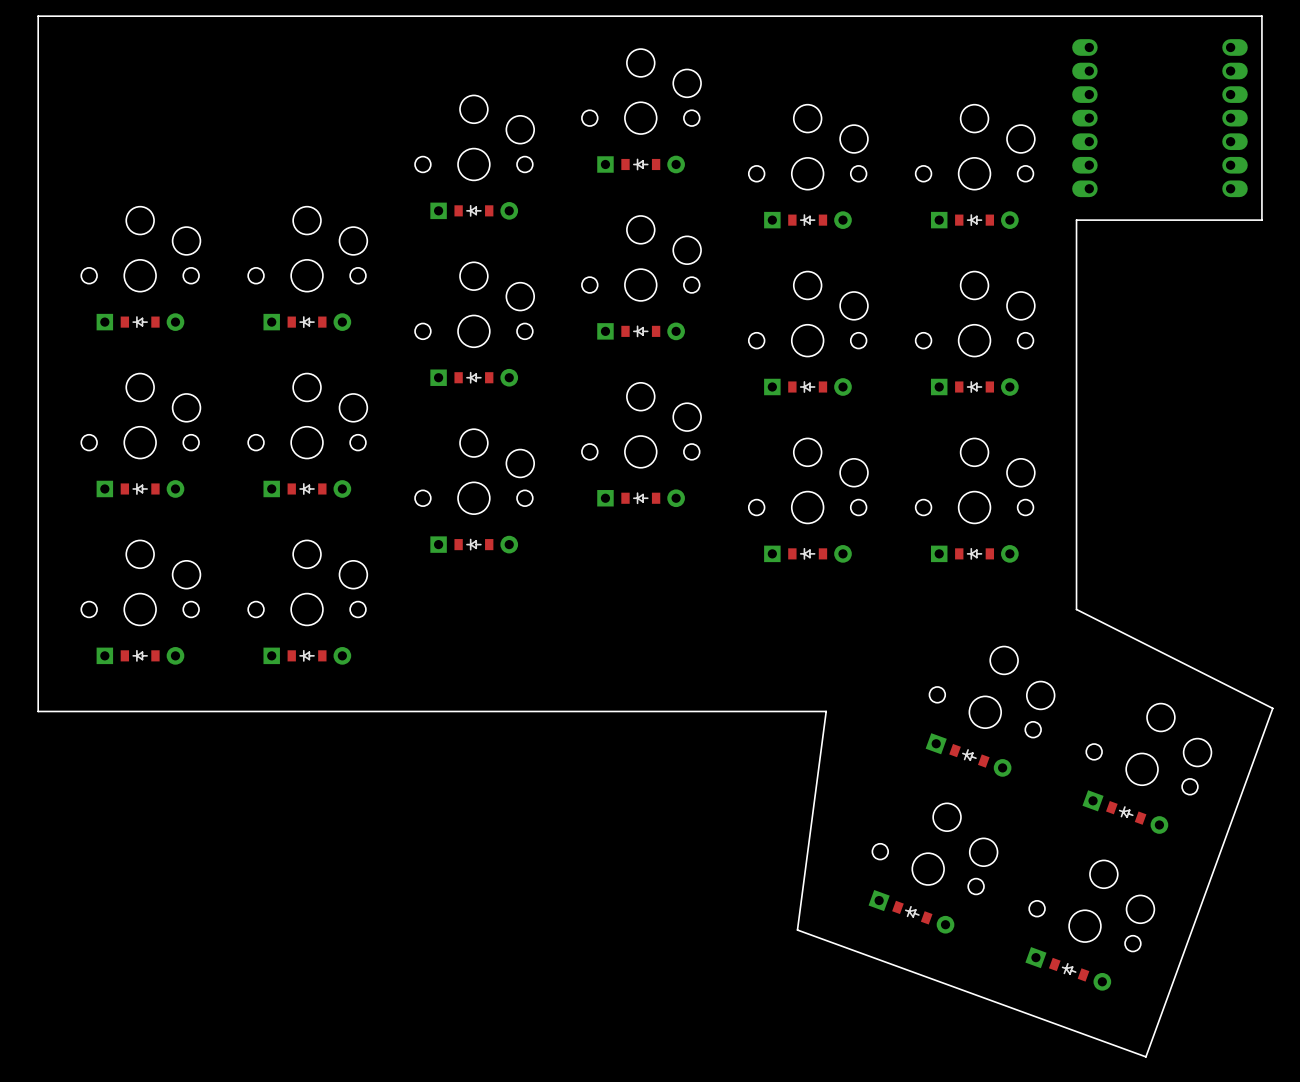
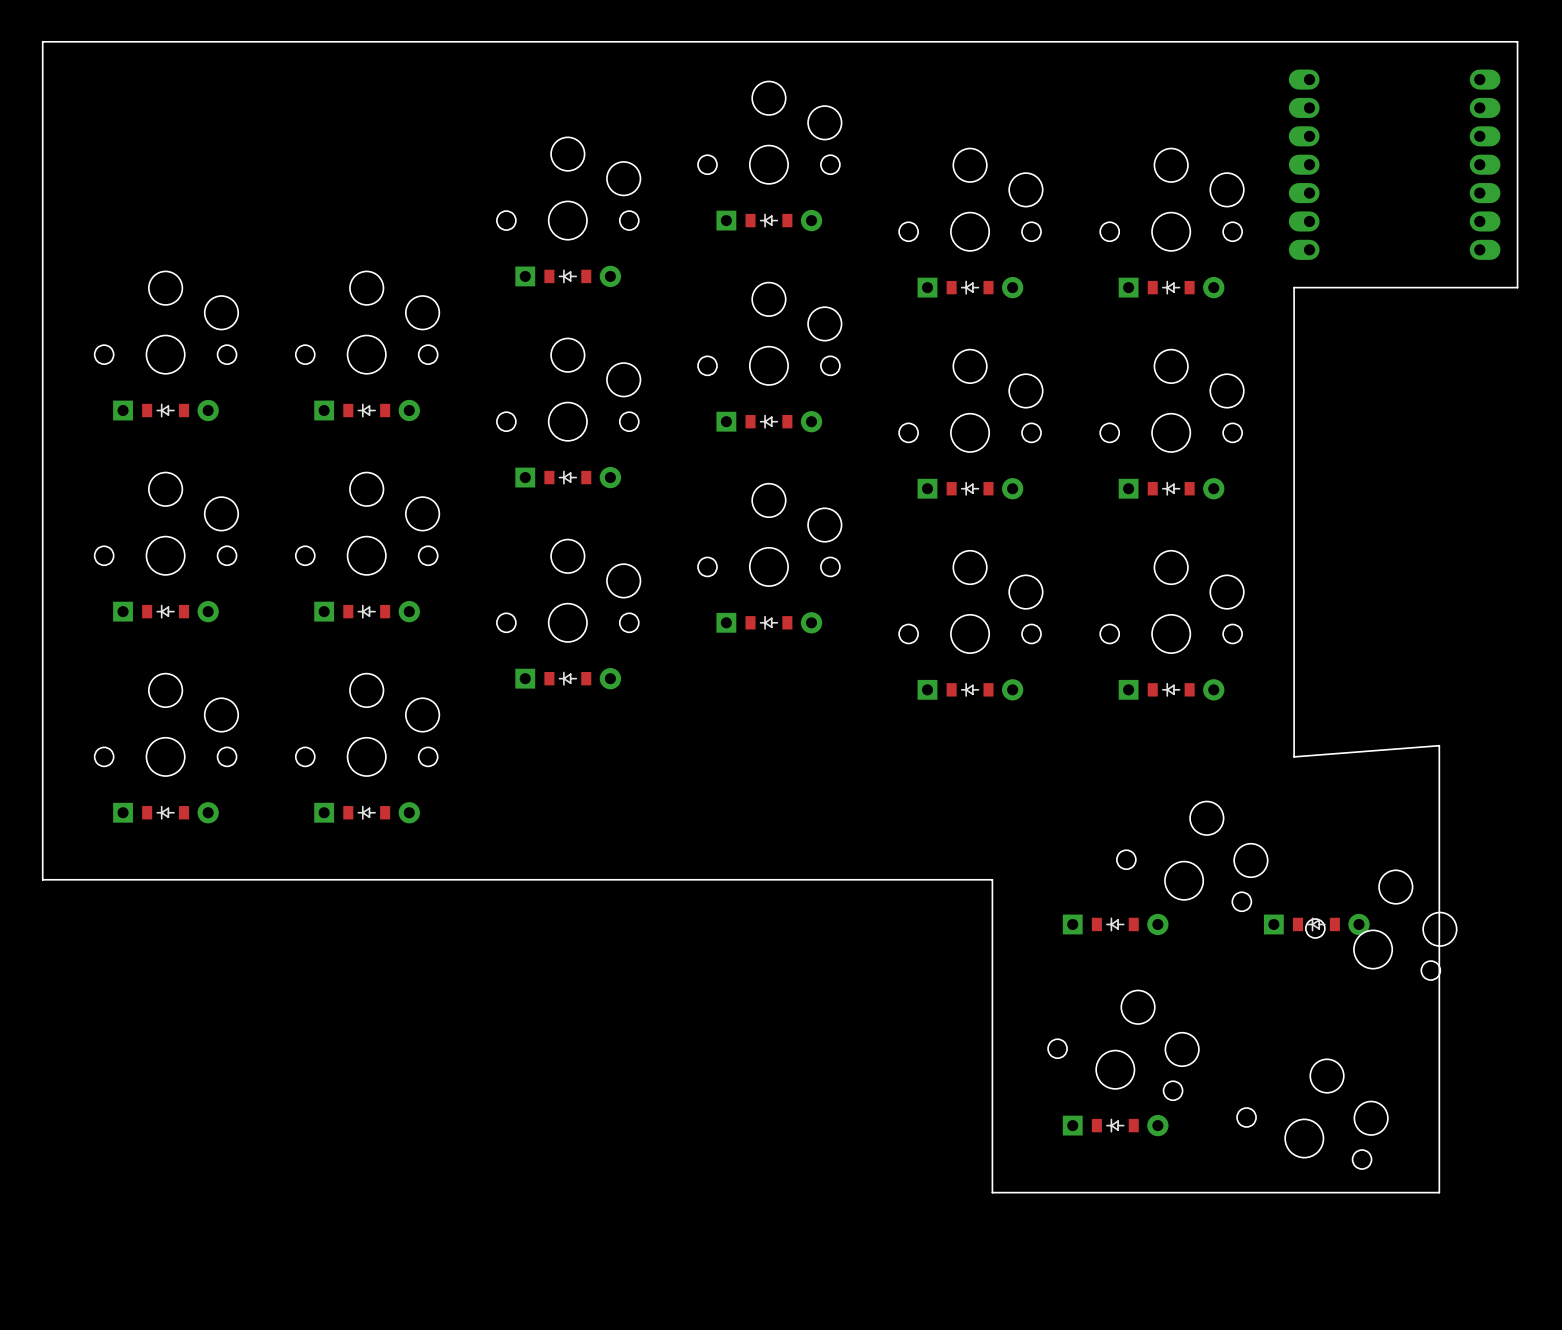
board edge: (1076, 609) (1272, 708) (1145, 1056) (797, 930) (826, 711) -> (1294, 756) (1439, 745) (1439, 1192) (992, 1192) (992, 879)
part: none -> (1115, 924)
part: none -> (1316, 924)
part: (968, 754) -> none
part: (1125, 812) -> none
part: (911, 911) -> none
part: none -> (1115, 1125)
part: (1068, 968) -> none

